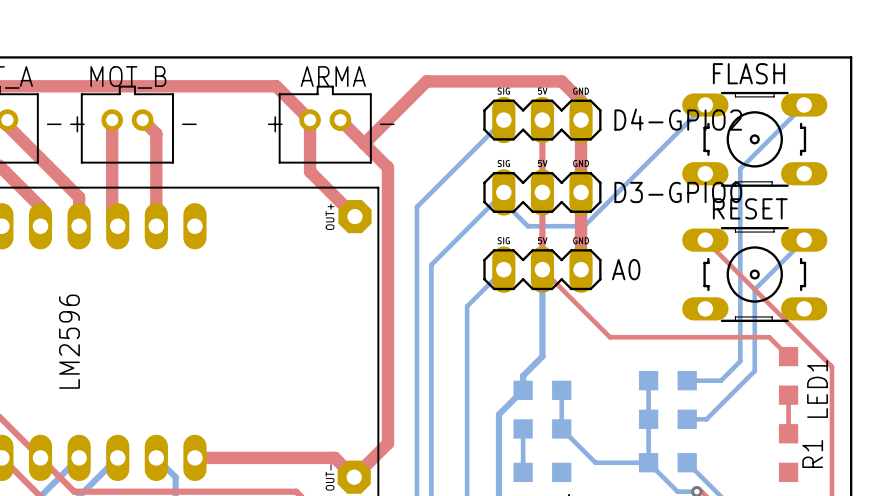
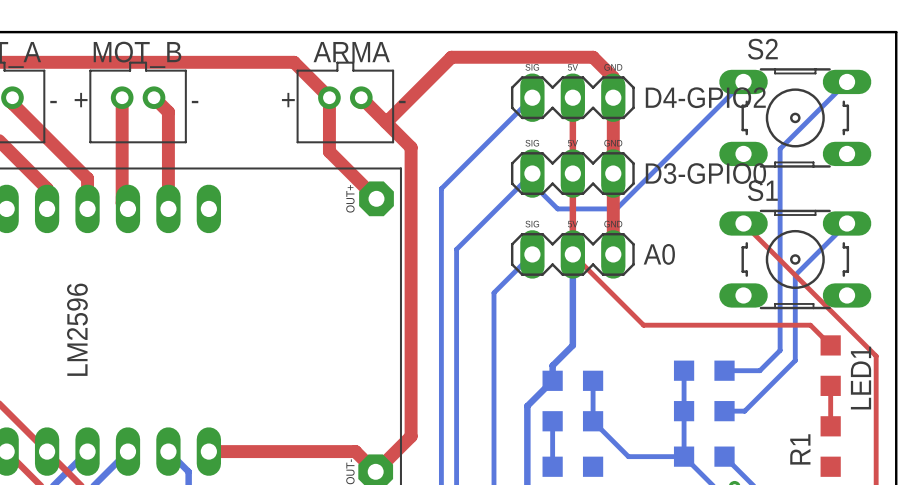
FLASH name: FLASH (749, 73) -> S2 (762, 49)
RESET name: RESET (750, 208) -> S1 (762, 190)
R1 name position: R1 (812, 453) -> R1 (800, 449)

